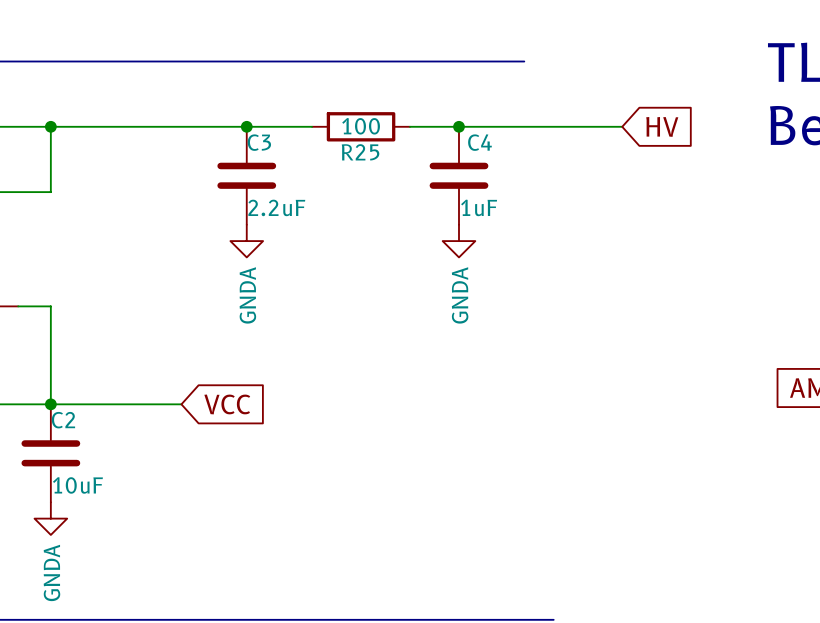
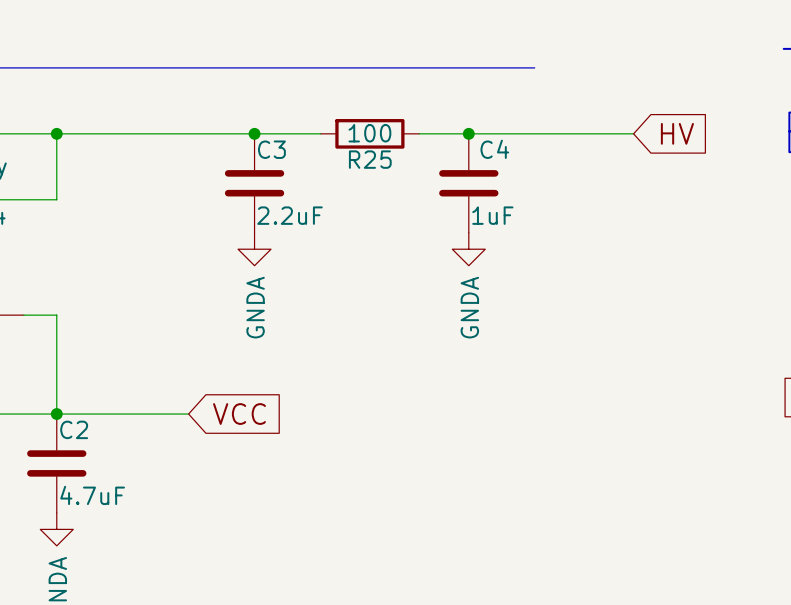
C2 value: 10uF (77, 485) -> 4.7uF (92, 495)

